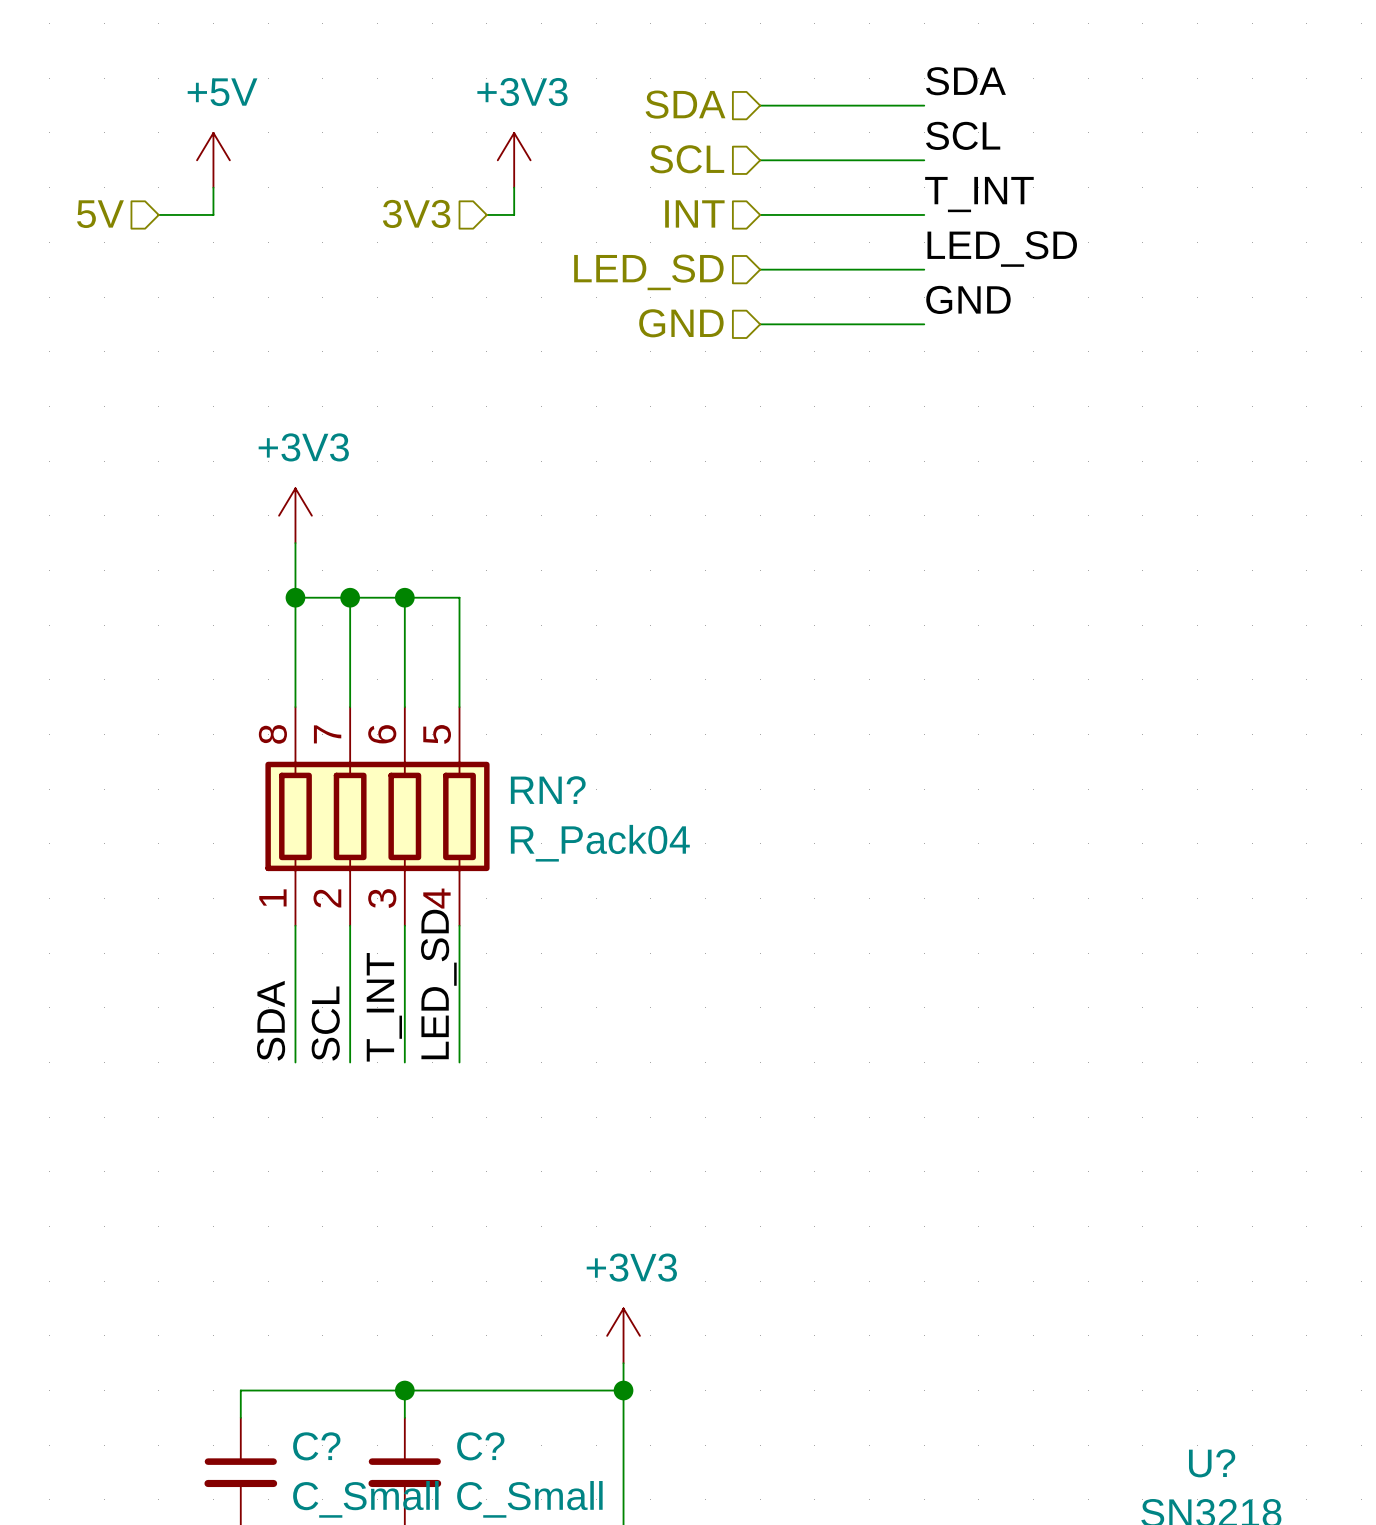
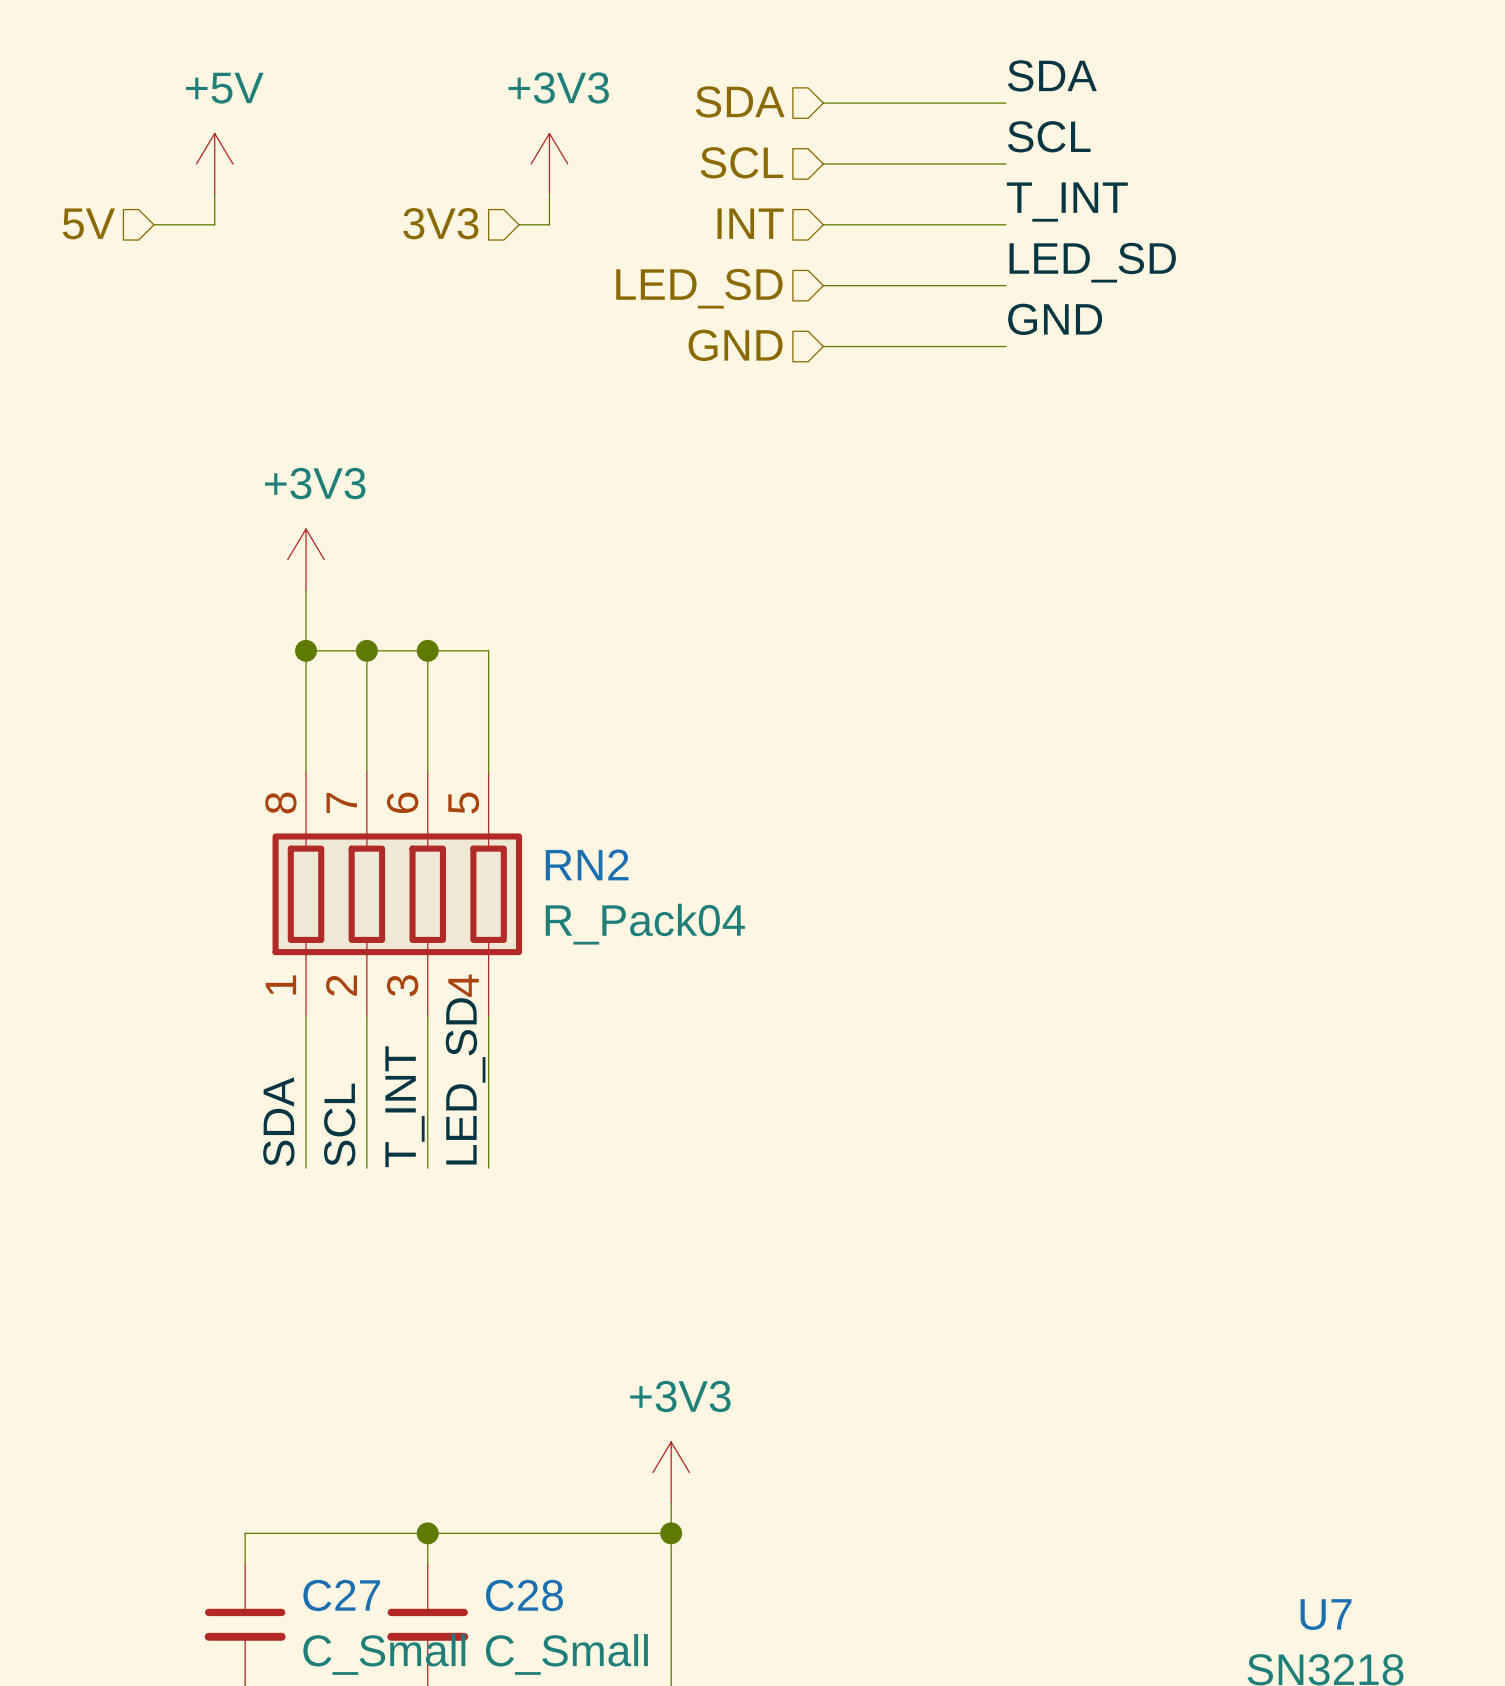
RN? name: RN? (548, 790) -> RN2 (587, 864)
C? name: C? (316, 1446) -> C27 (341, 1595)
C? name: C? (480, 1446) -> C28 (524, 1595)
U? name: U? (1212, 1463) -> U7 (1326, 1614)

